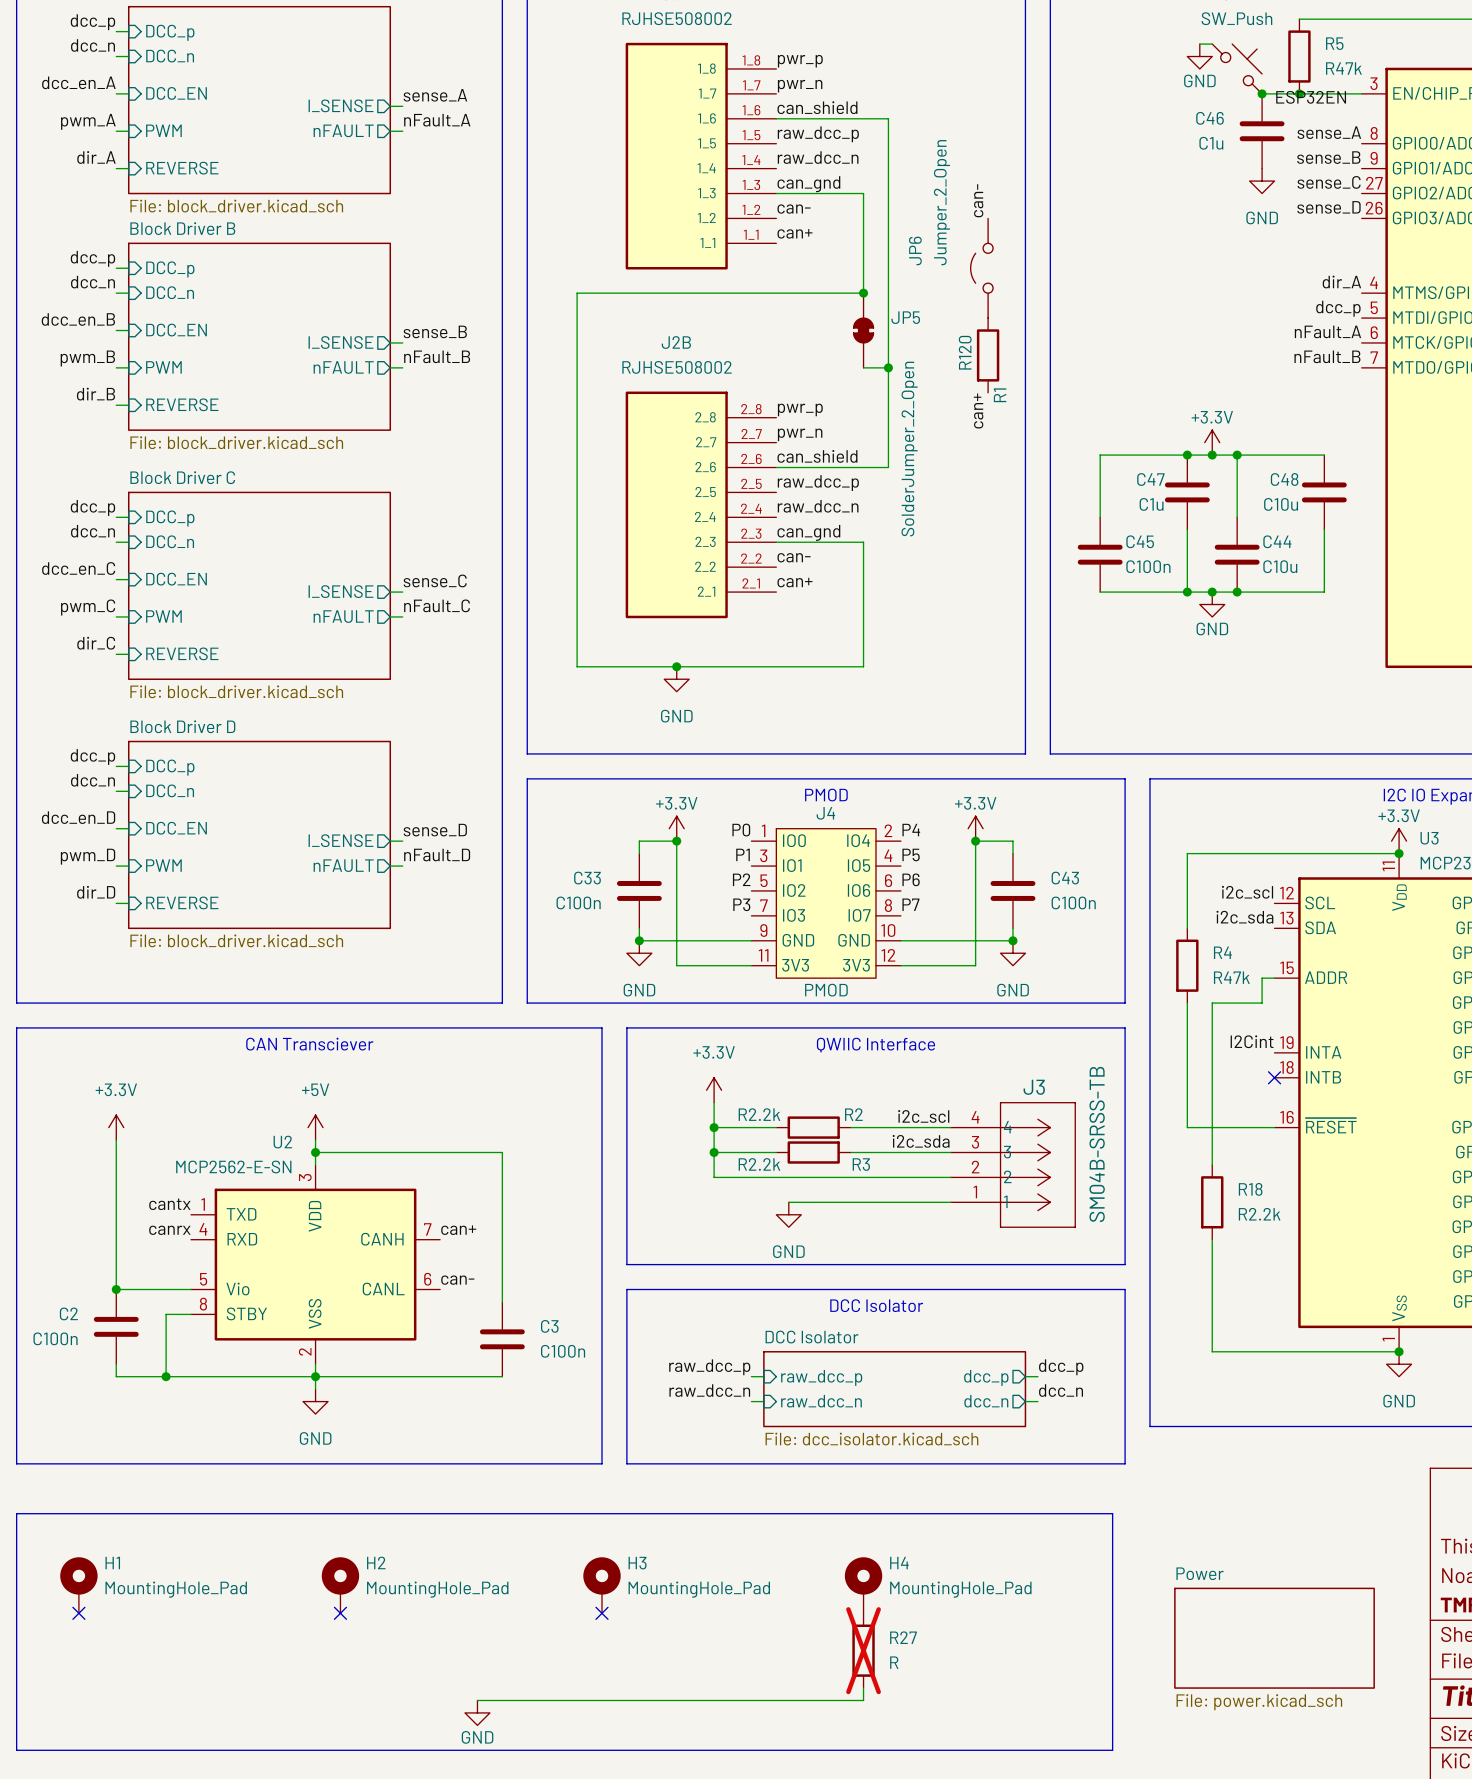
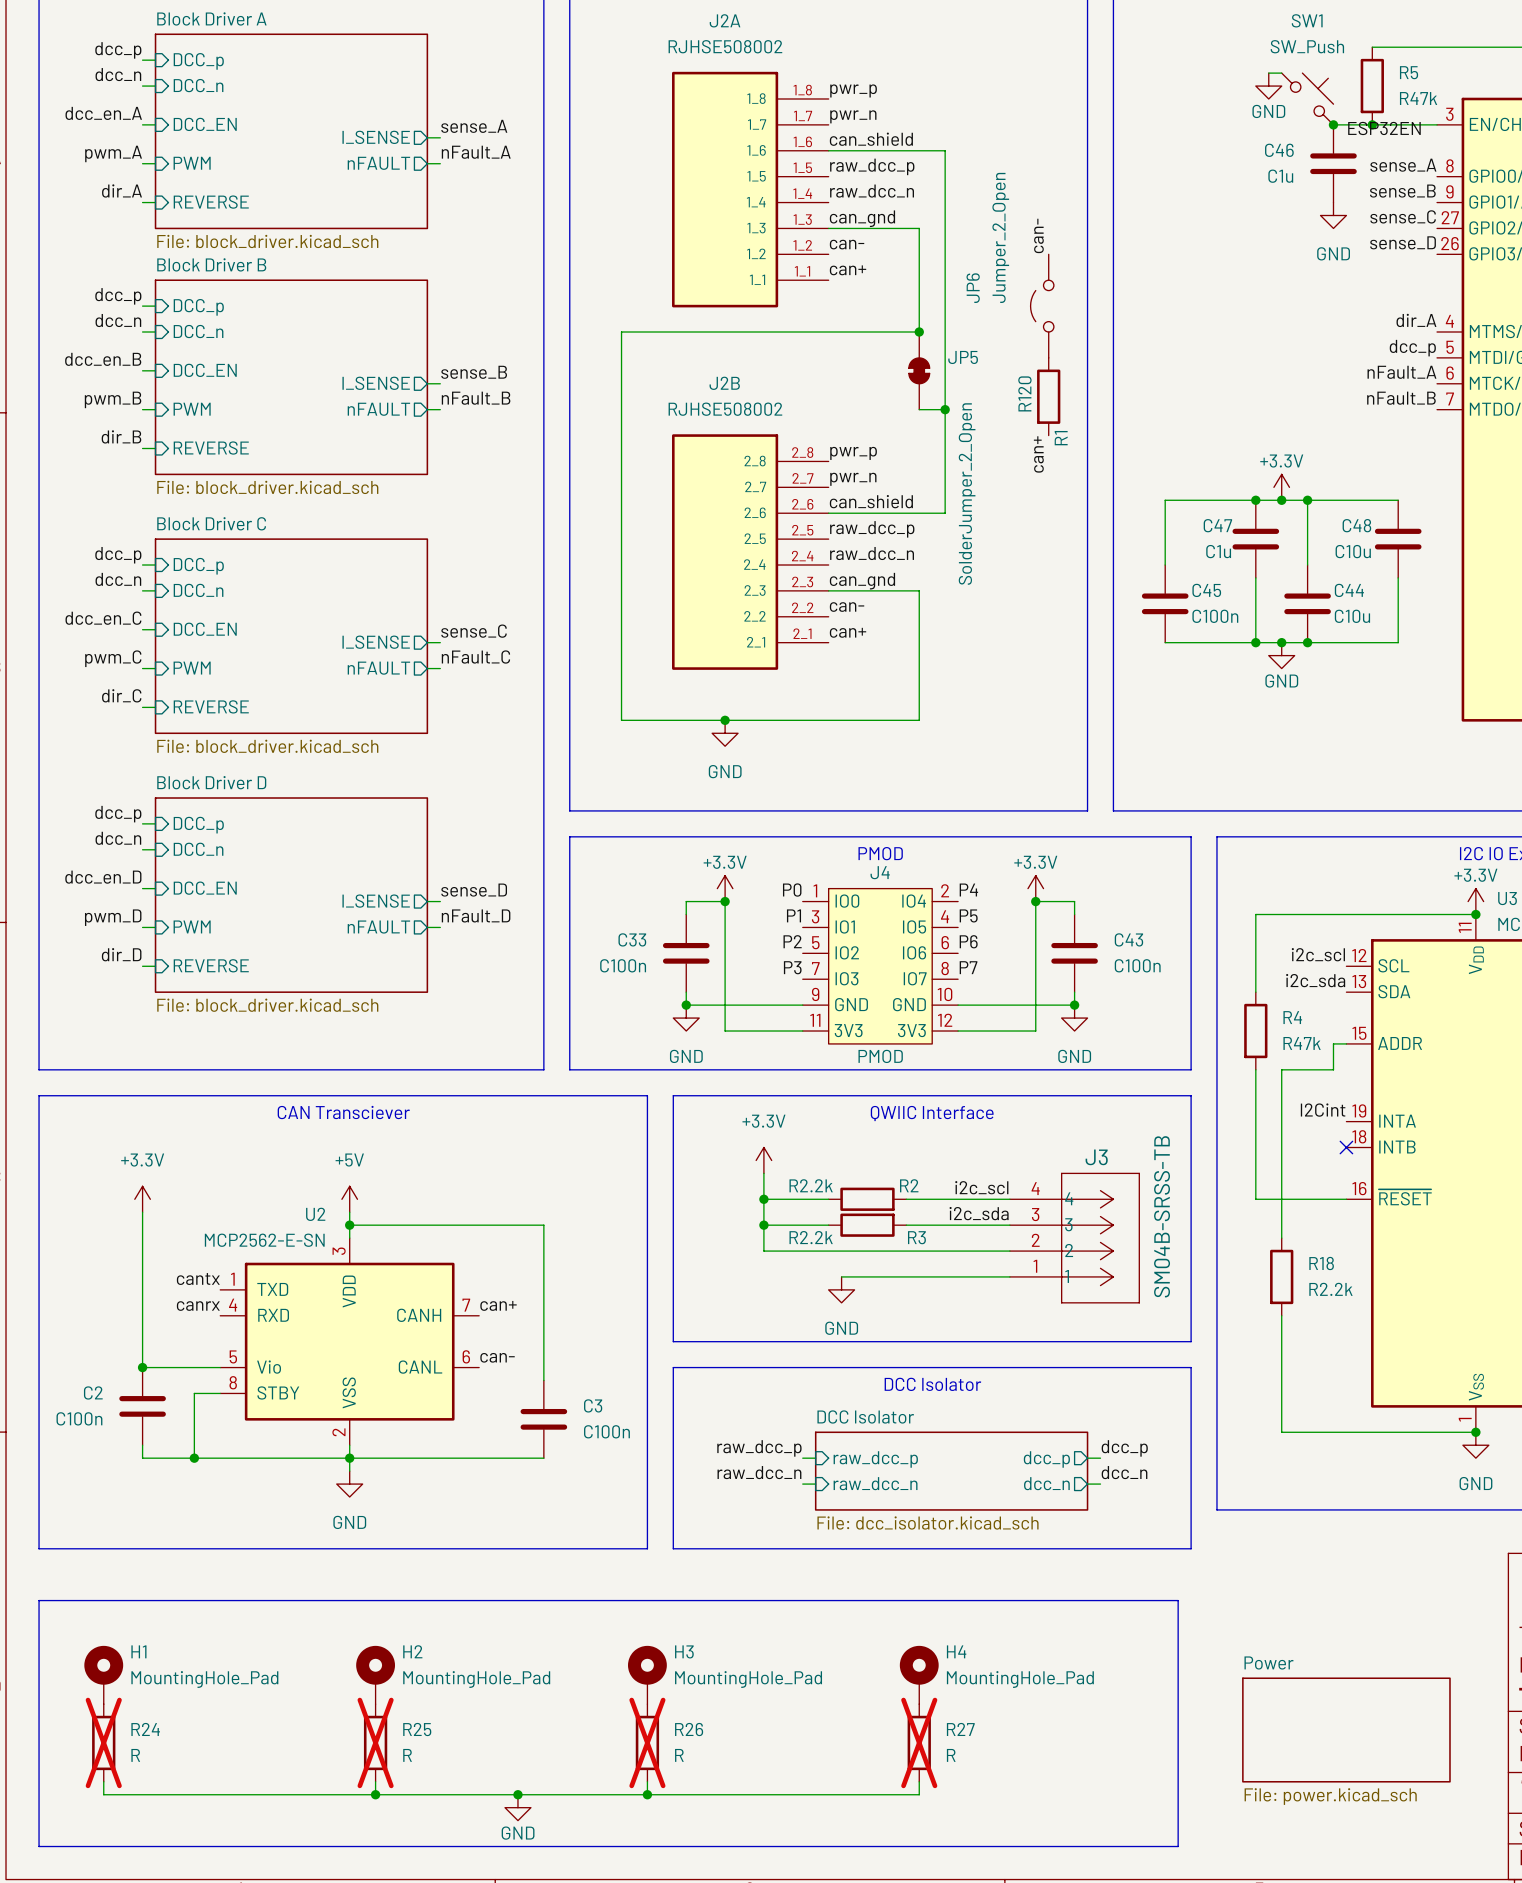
no-connect mark: (78, 1613) -> none
no-connect mark: (340, 1613) -> none
no-connect mark: (601, 1613) -> none
R24: none -> R (103, 1742)
R25: none -> R (375, 1742)
R26: none -> R (647, 1742)
wire: none -> (103, 1781) (103, 1794) (517, 1794)
wire: none -> (375, 1781) (375, 1794)
wire: none -> (647, 1781) (647, 1794)
junction: none -> (375, 1794)
junction: none -> (517, 1794)
junction: none -> (647, 1794)

